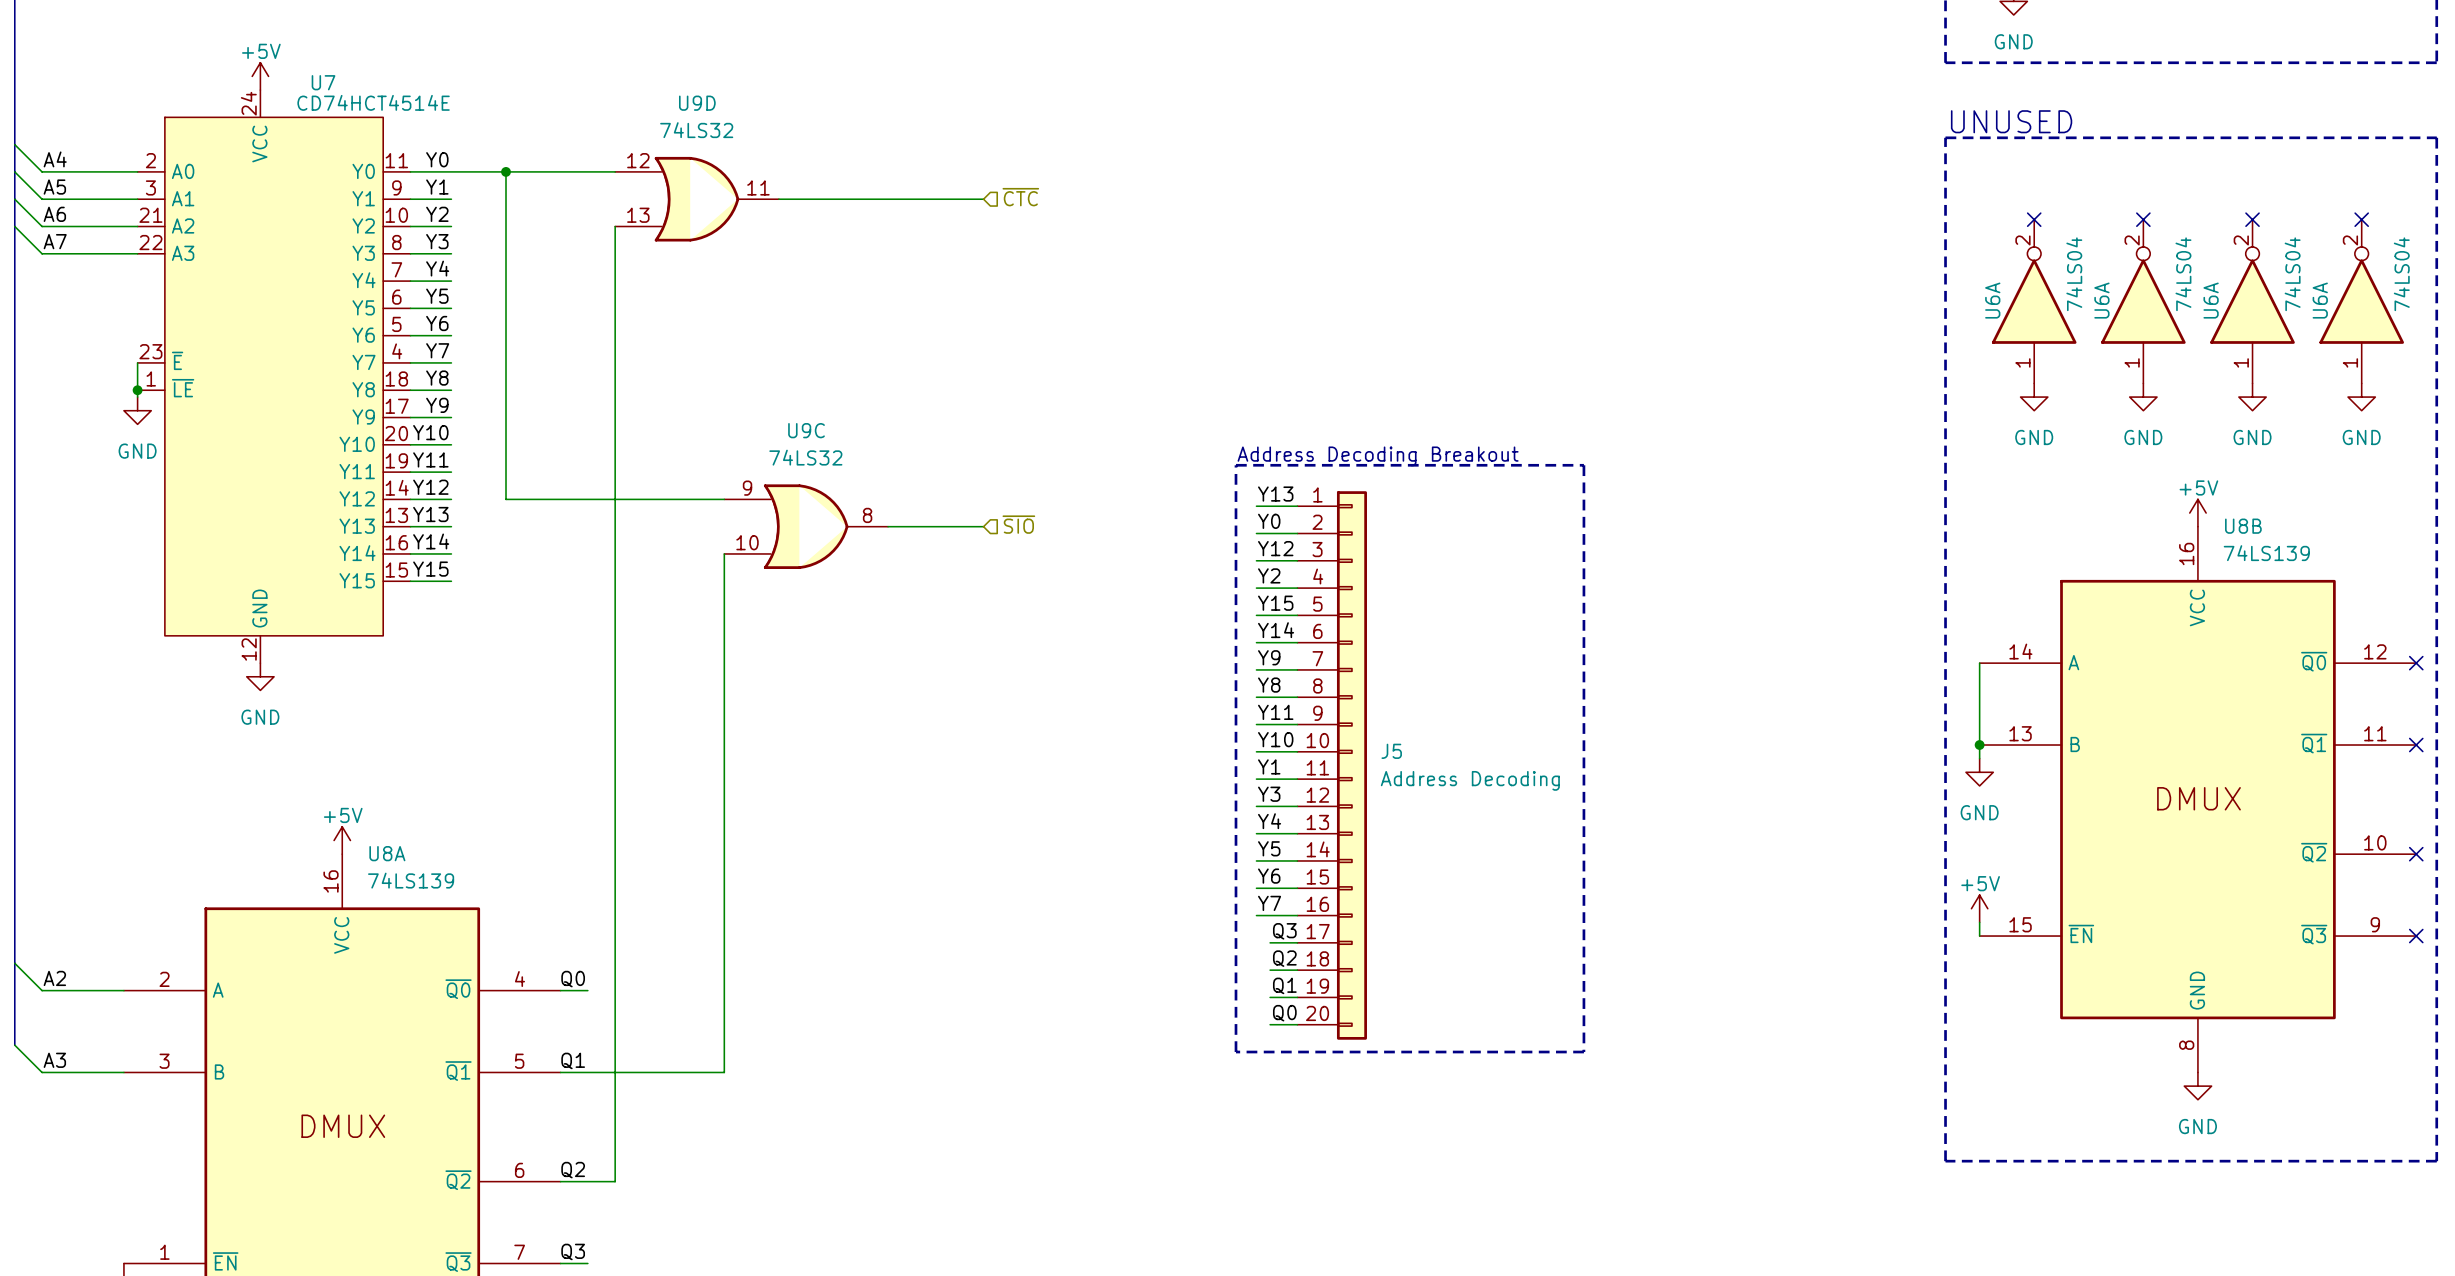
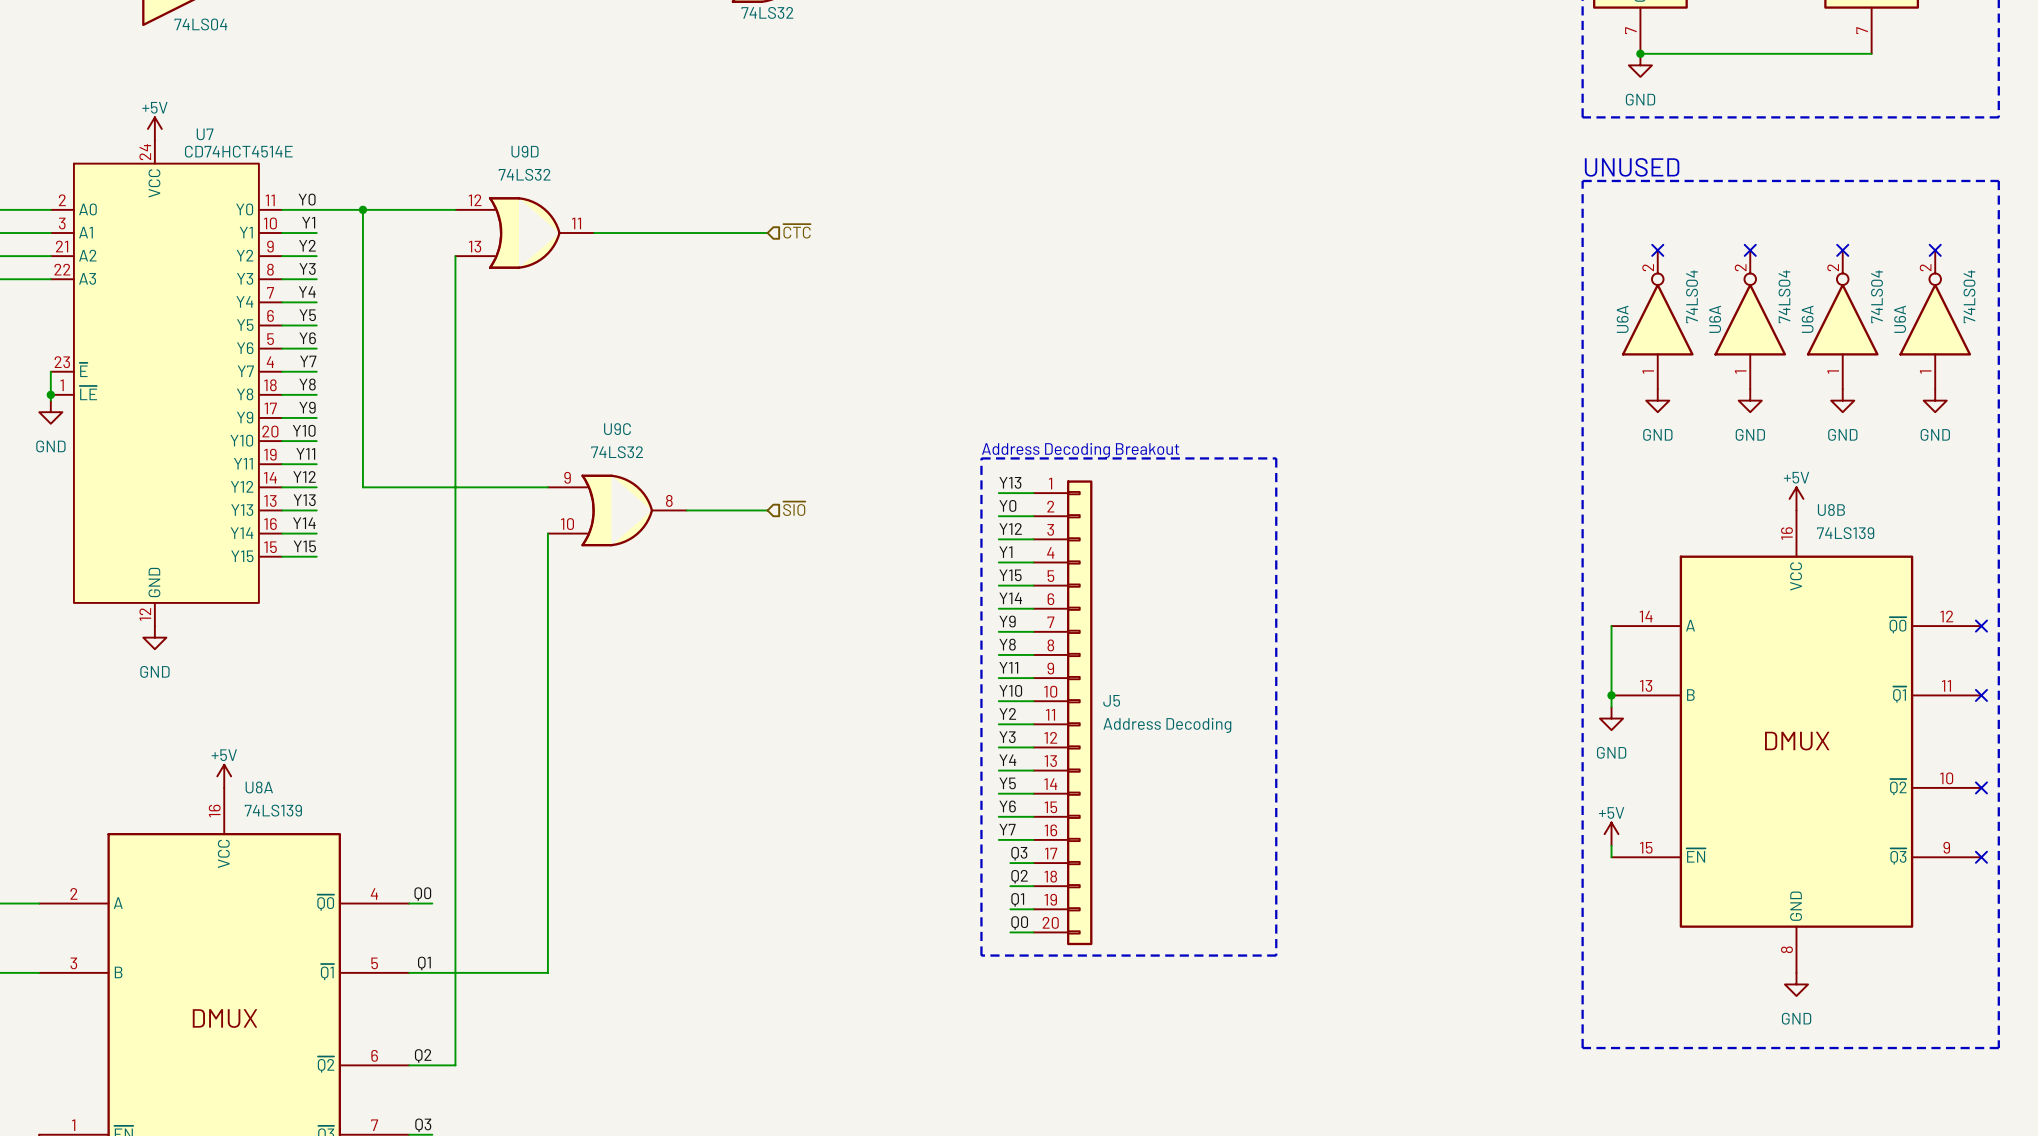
U7 pin number: 9 (396, 187) -> 10 (270, 223)
U7 pin number: 10 (396, 215) -> 9 (270, 246)
label: Y2 (1269, 575) -> Y1 (1005, 552)
label: Y1 (1269, 766) -> Y2 (1007, 713)

